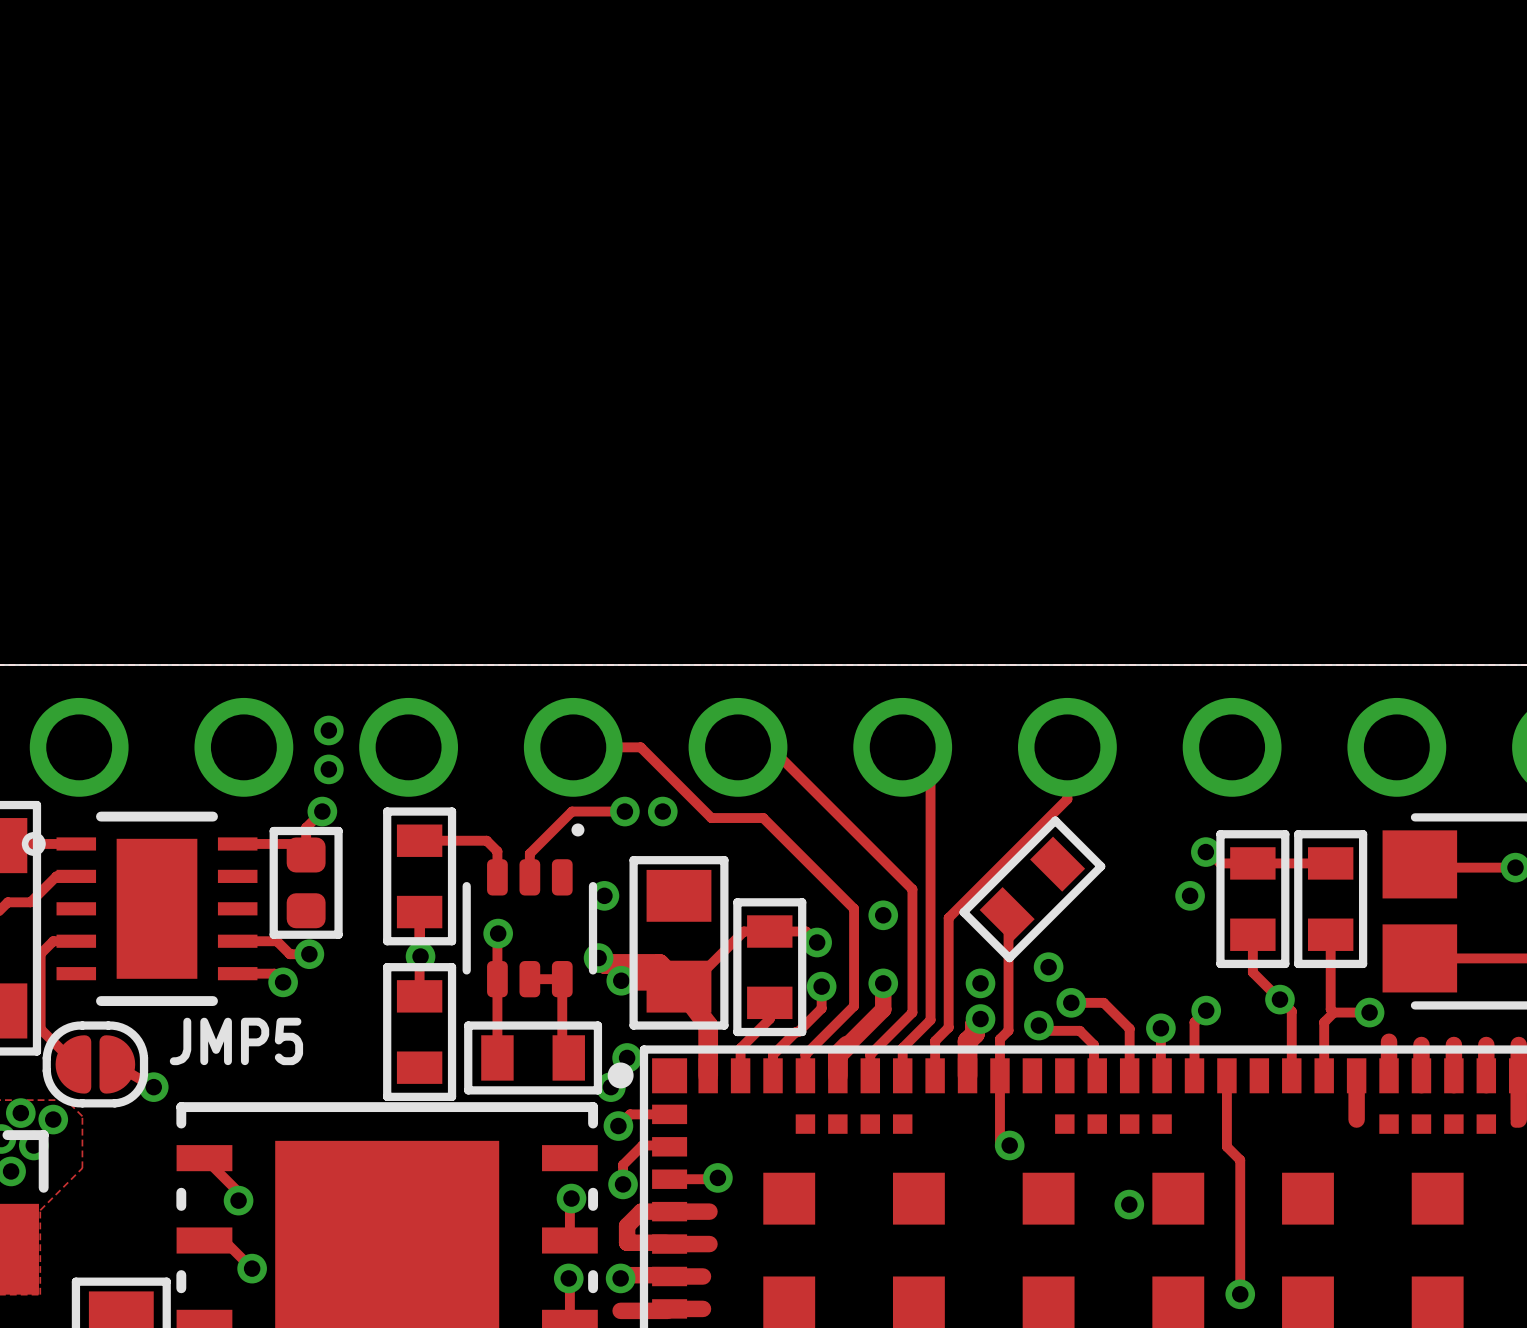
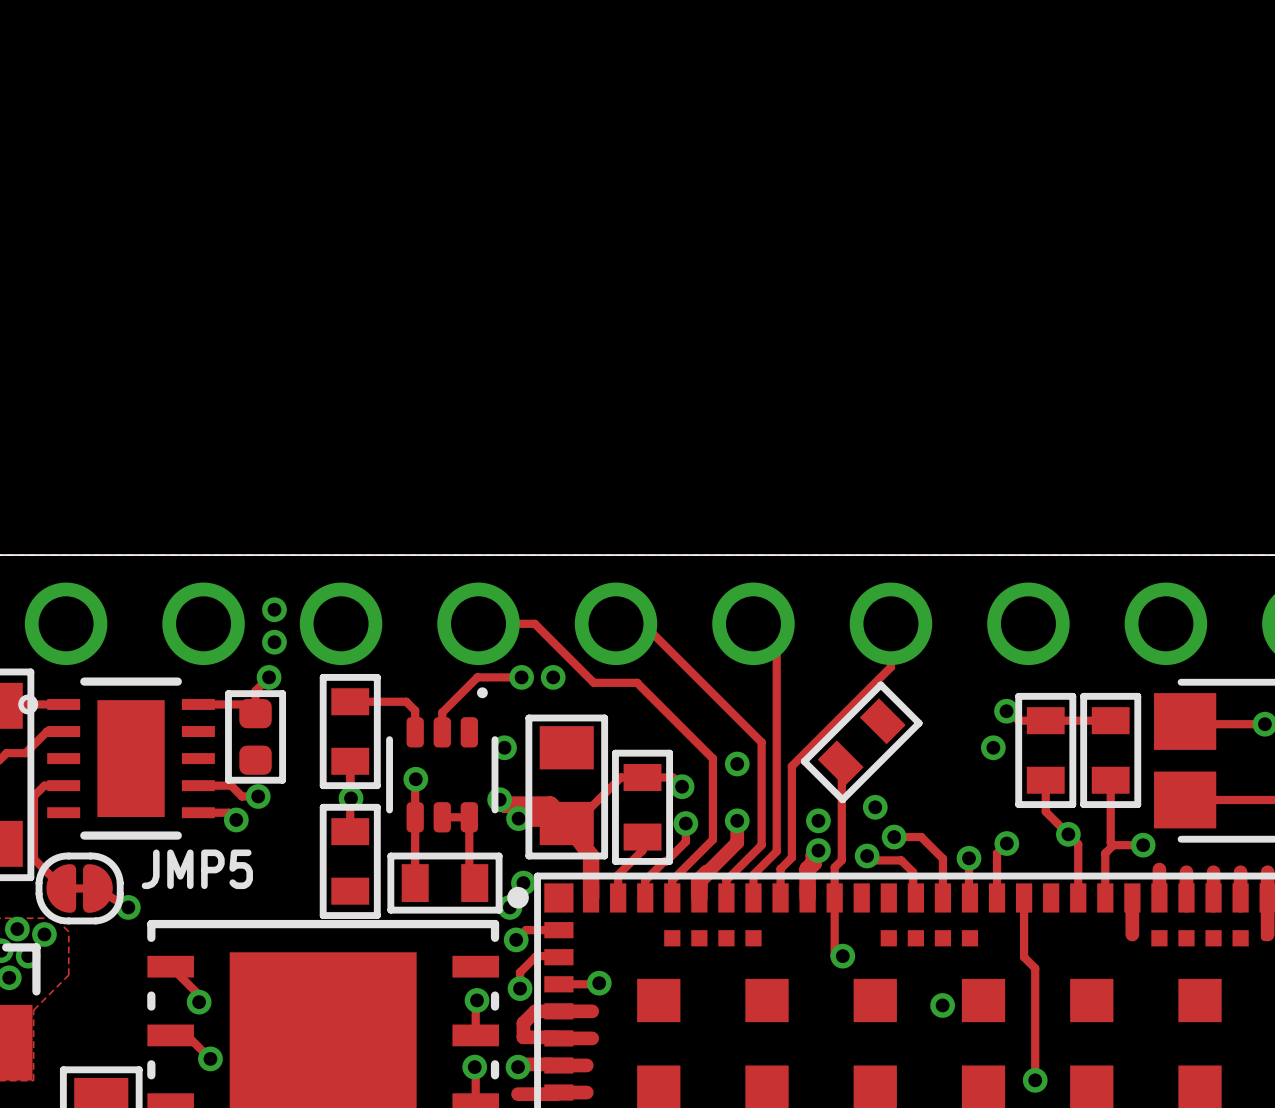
JMP5 footprint: [42, 1021, 149, 1108] -> [35, 852, 124, 925]

